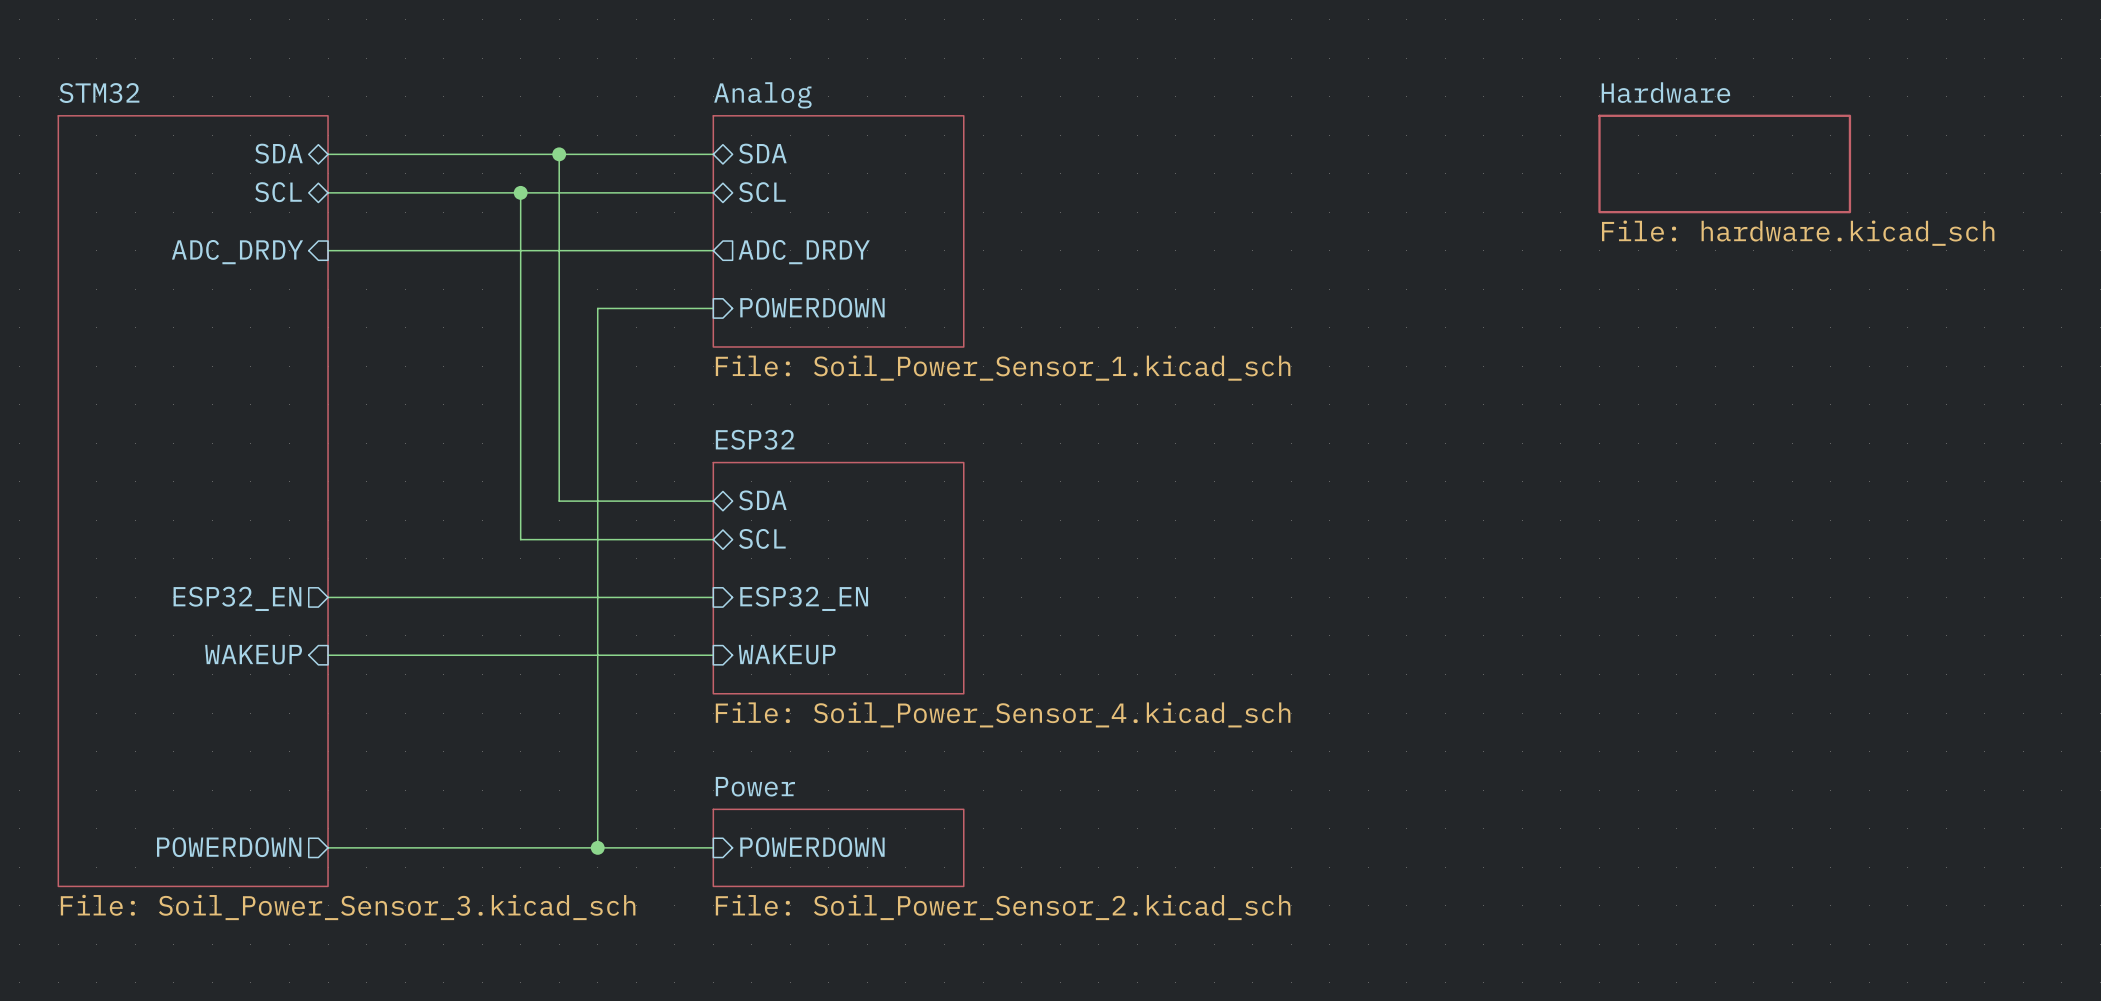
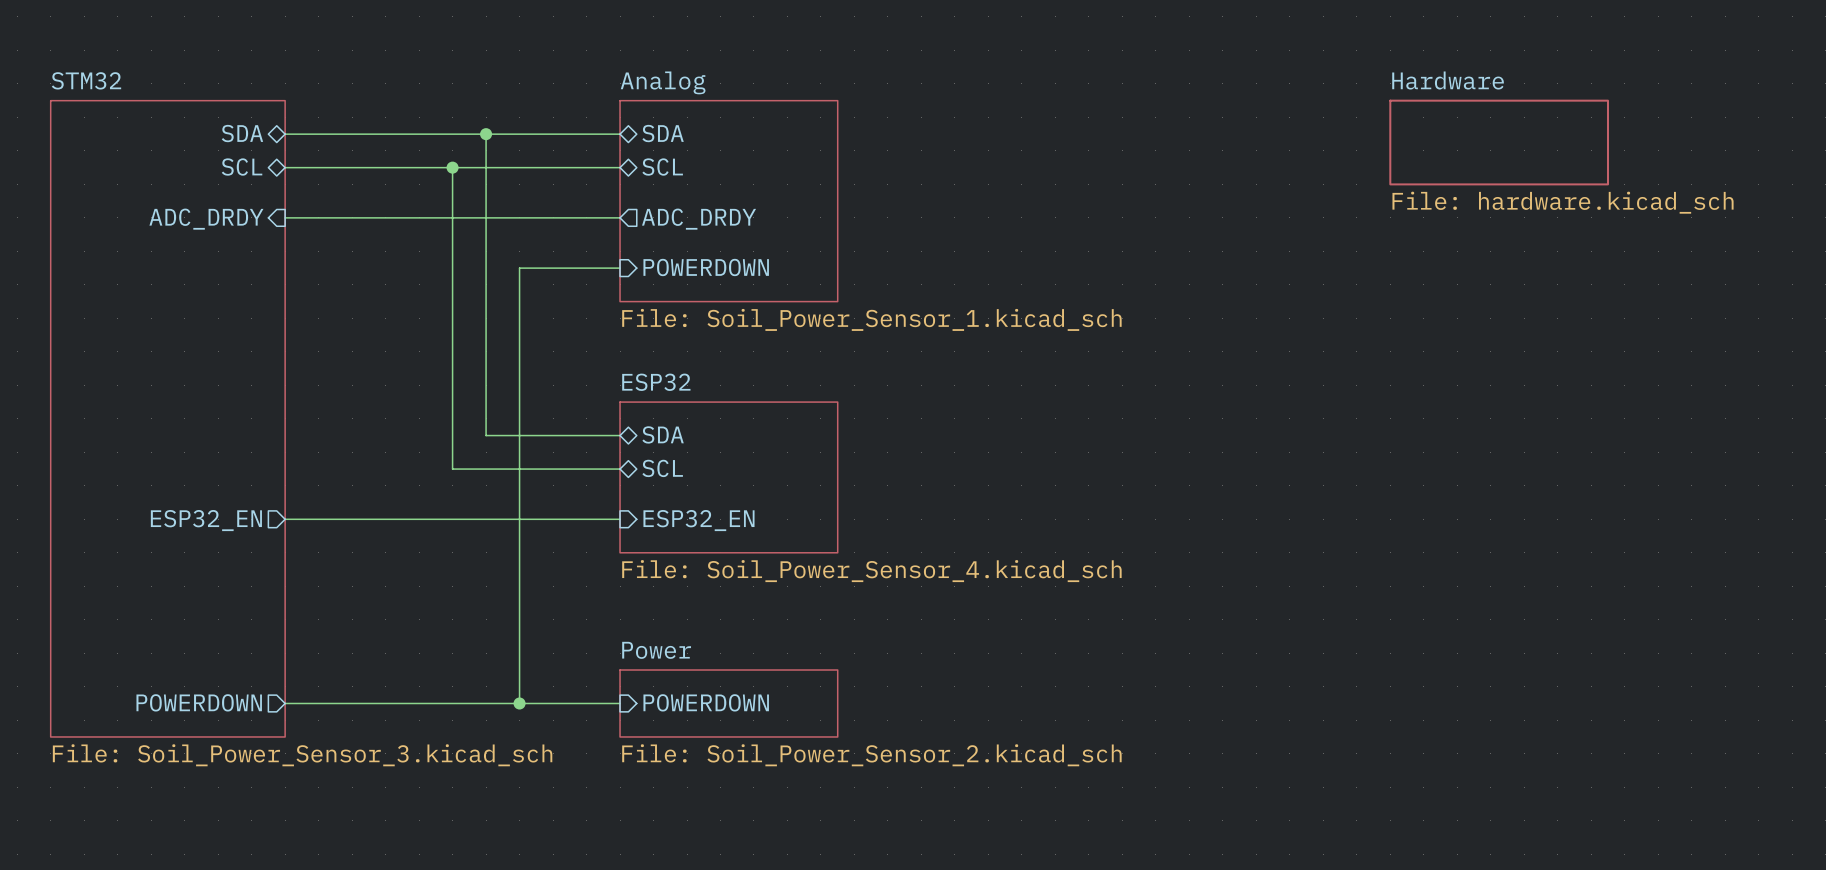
sheet STM32 shape: [58, 115, 329, 887] -> [50, 100, 286, 737]
sheet ESP32 shape: [713, 462, 964, 694] -> [620, 402, 838, 553]
sheet pin: WAKEUP (253, 654) -> none
sheet pin: WAKEUP (787, 654) -> none
wire: (328, 655) (713, 655) -> none
wire: (597, 809) (597, 847) -> none
sheet pin position: POWERDOWN (229, 847) -> POWERDOWN (199, 702)
wire: (328, 847) (713, 847) -> (285, 703) (620, 703)
junction position: (597, 847) -> (519, 703)
sheet pin position: POWERDOWN (812, 847) -> POWERDOWN (706, 702)
sheet Power position: (838, 847) -> (728, 703)

